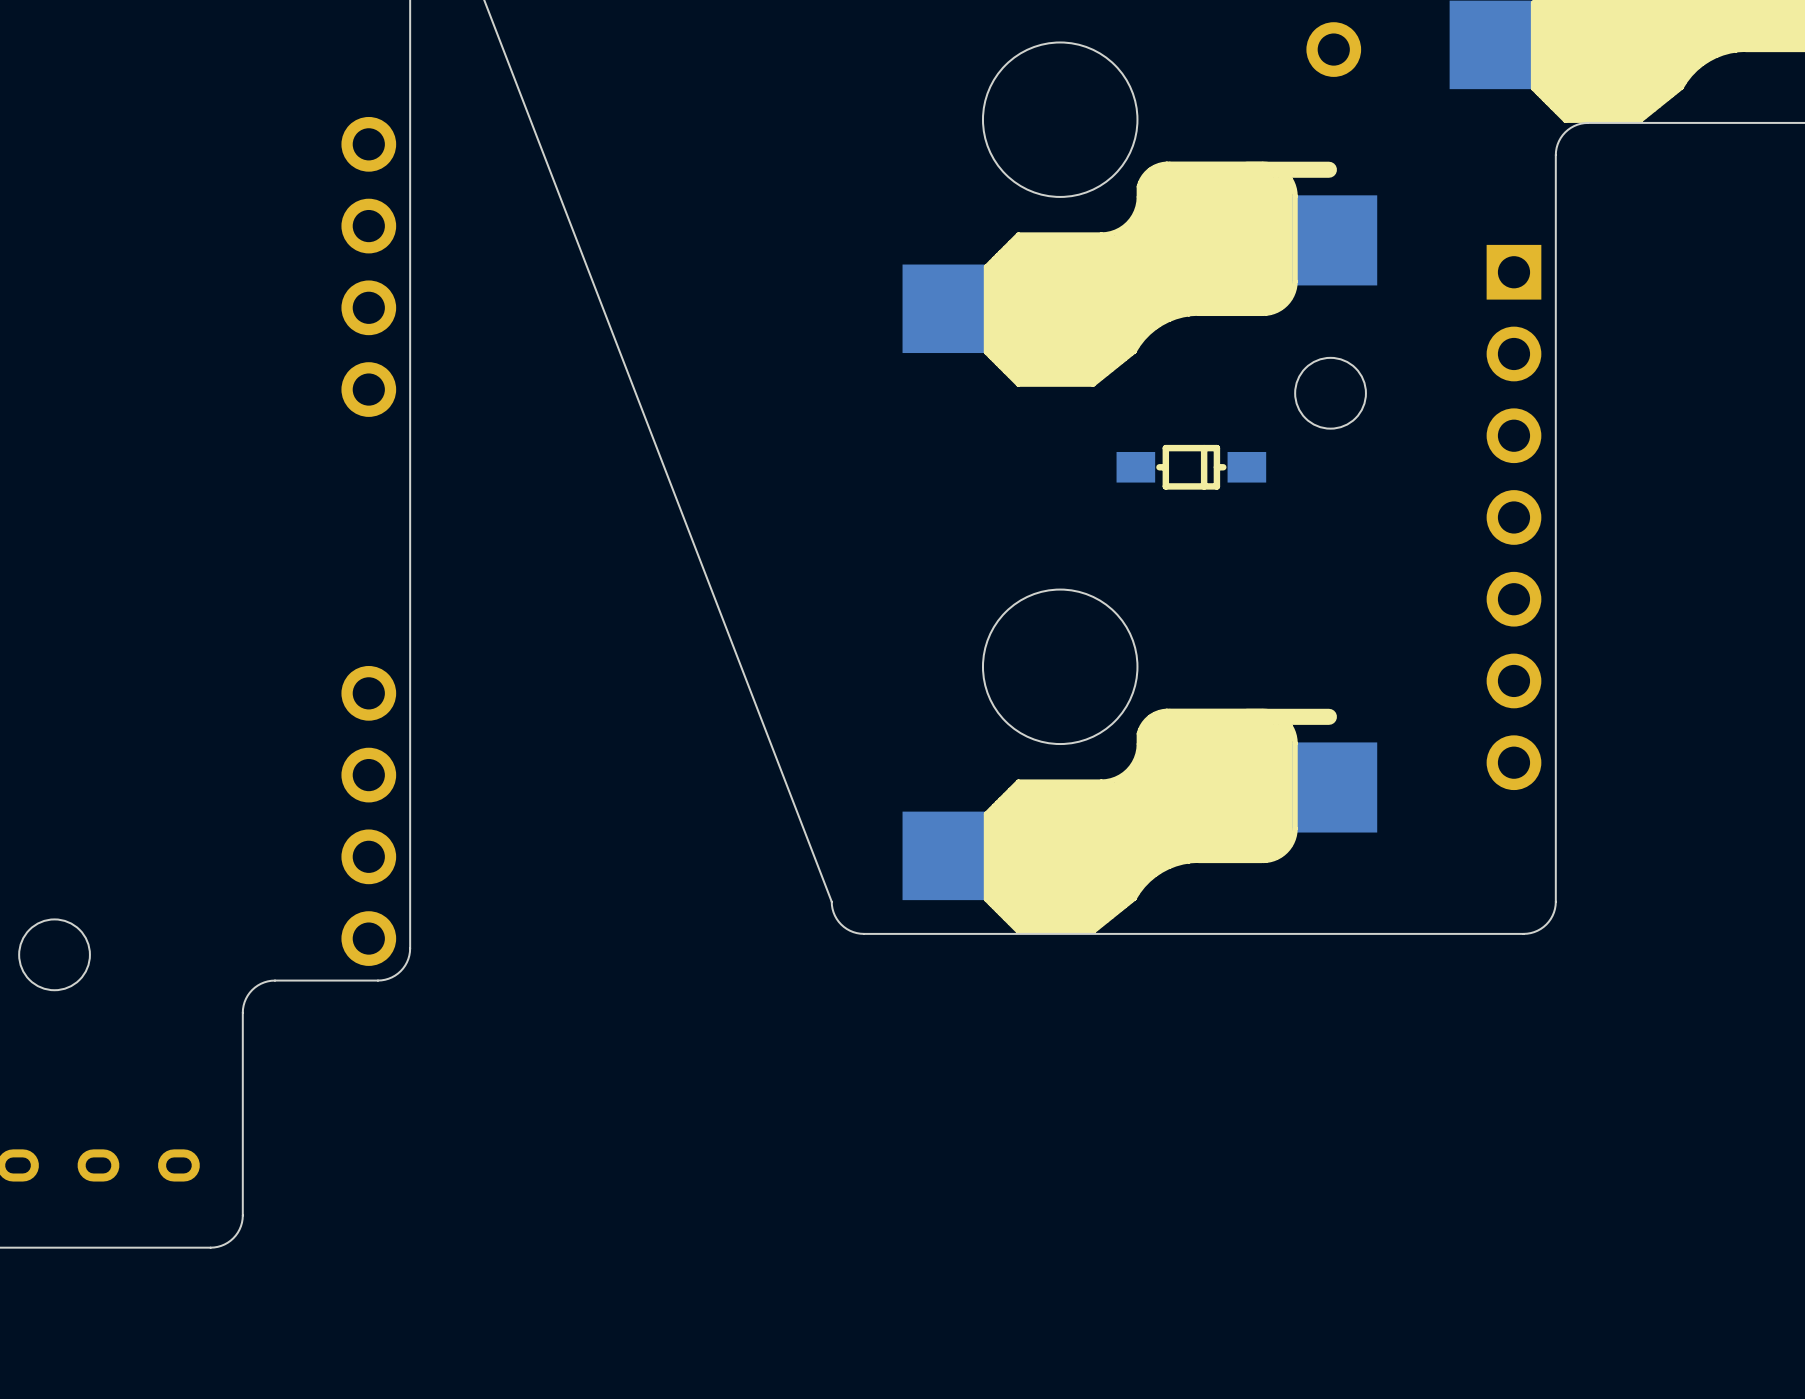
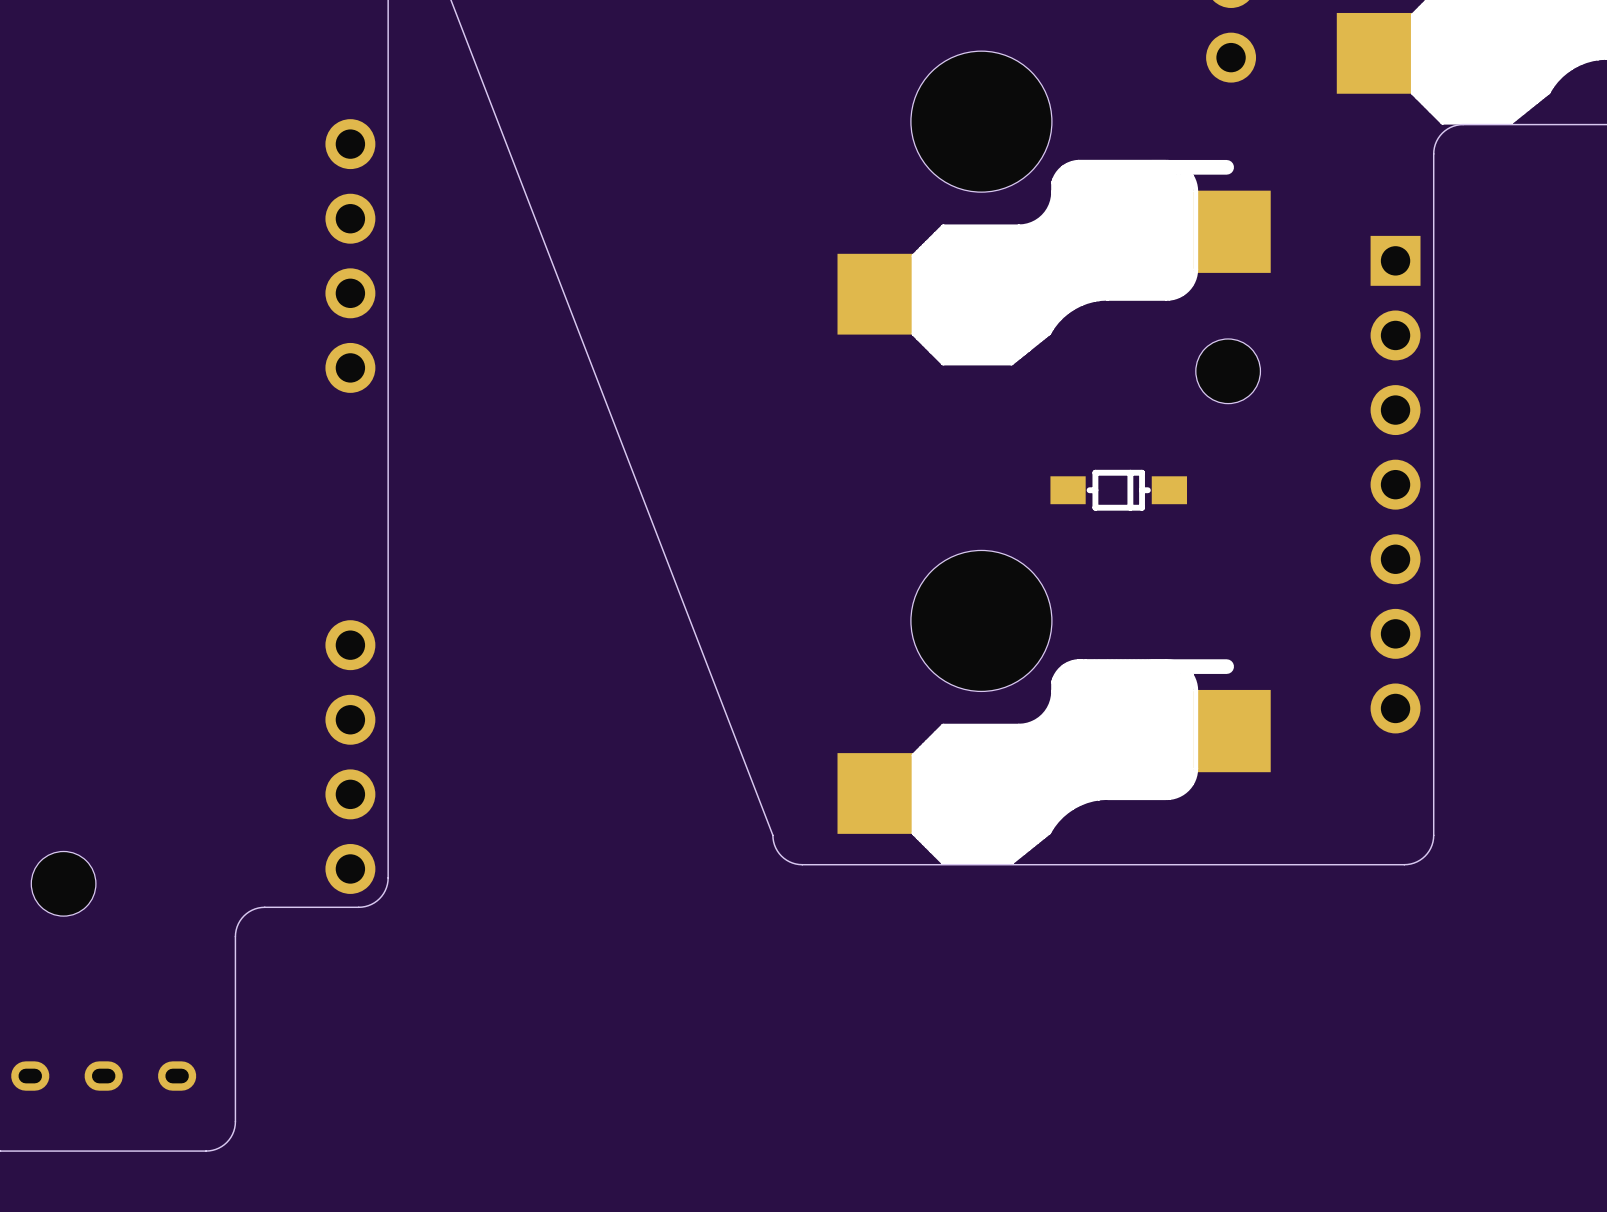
part position: (1191, 467) -> (1118, 490)

